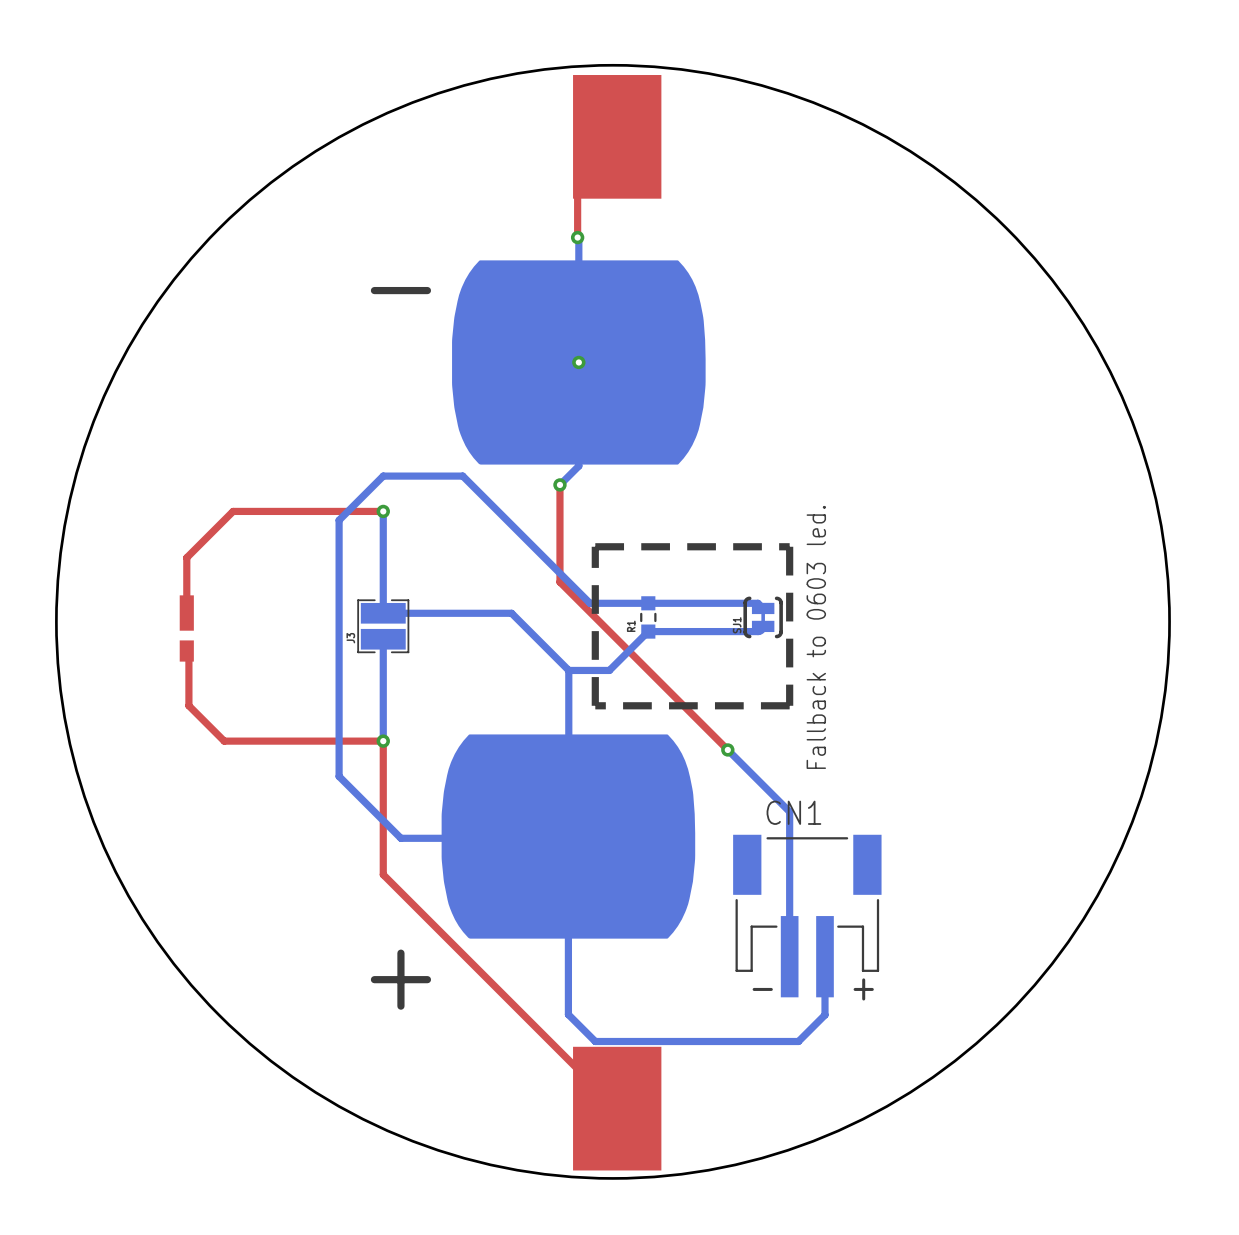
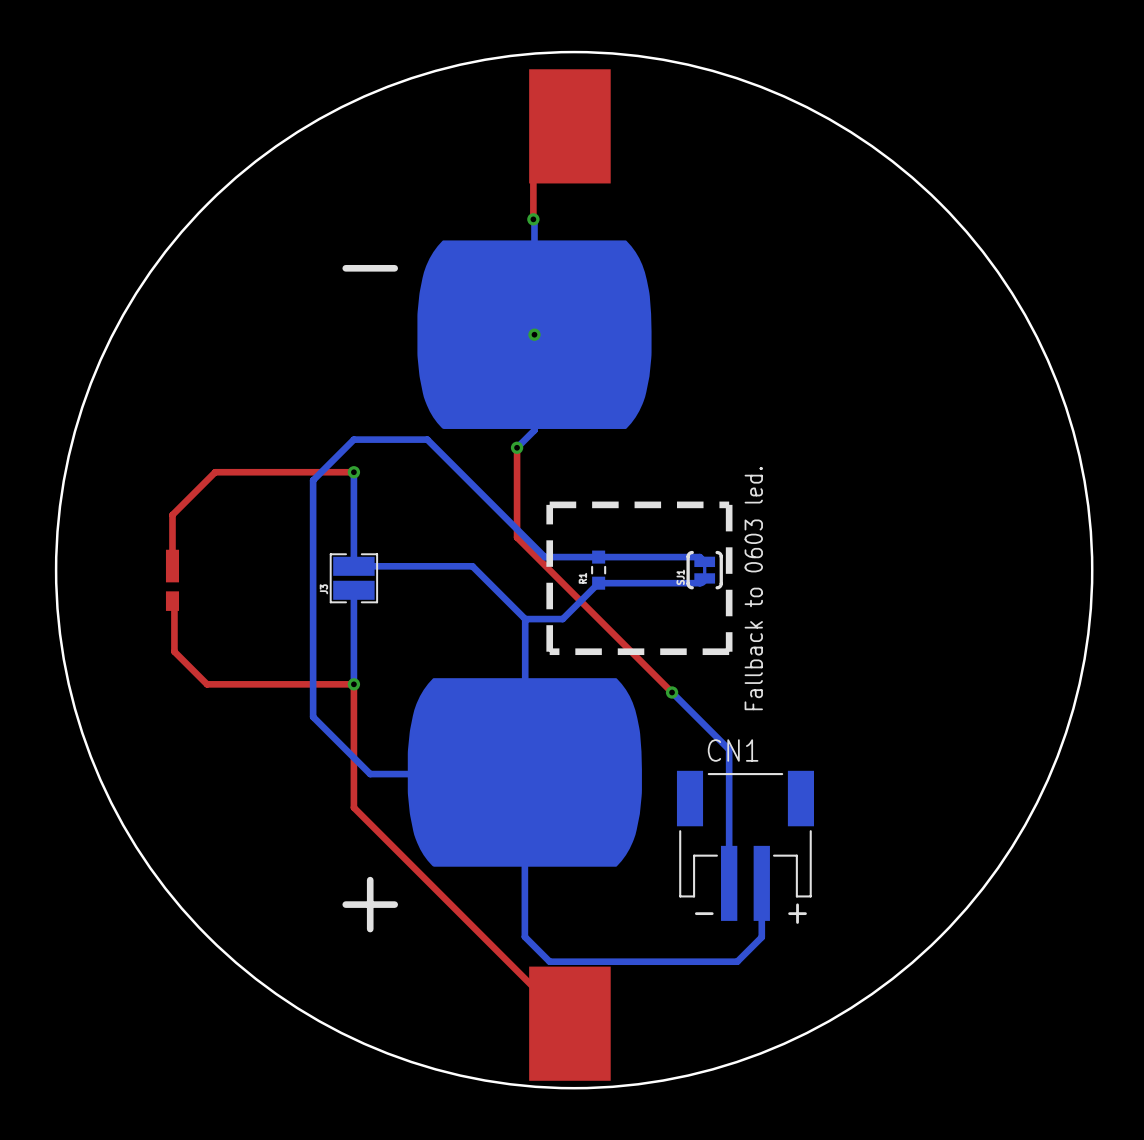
round board edge size: [55, 63, 1171, 1180] -> [54, 50, 1094, 1090]

